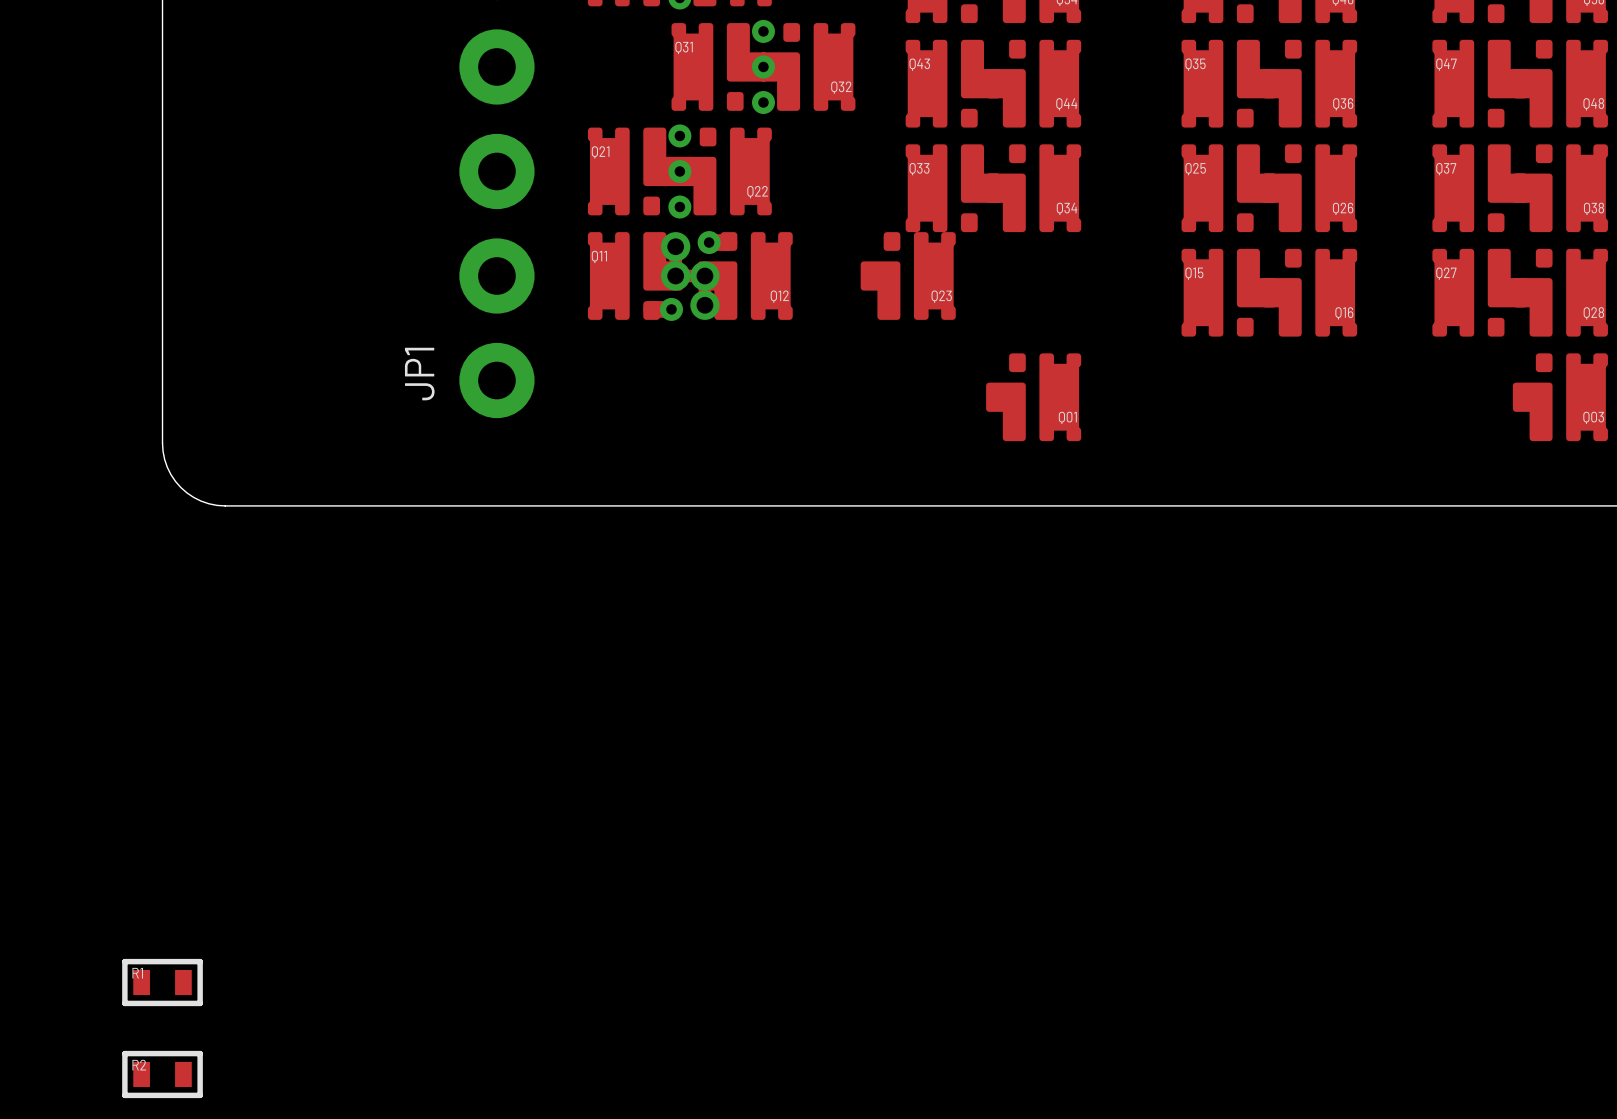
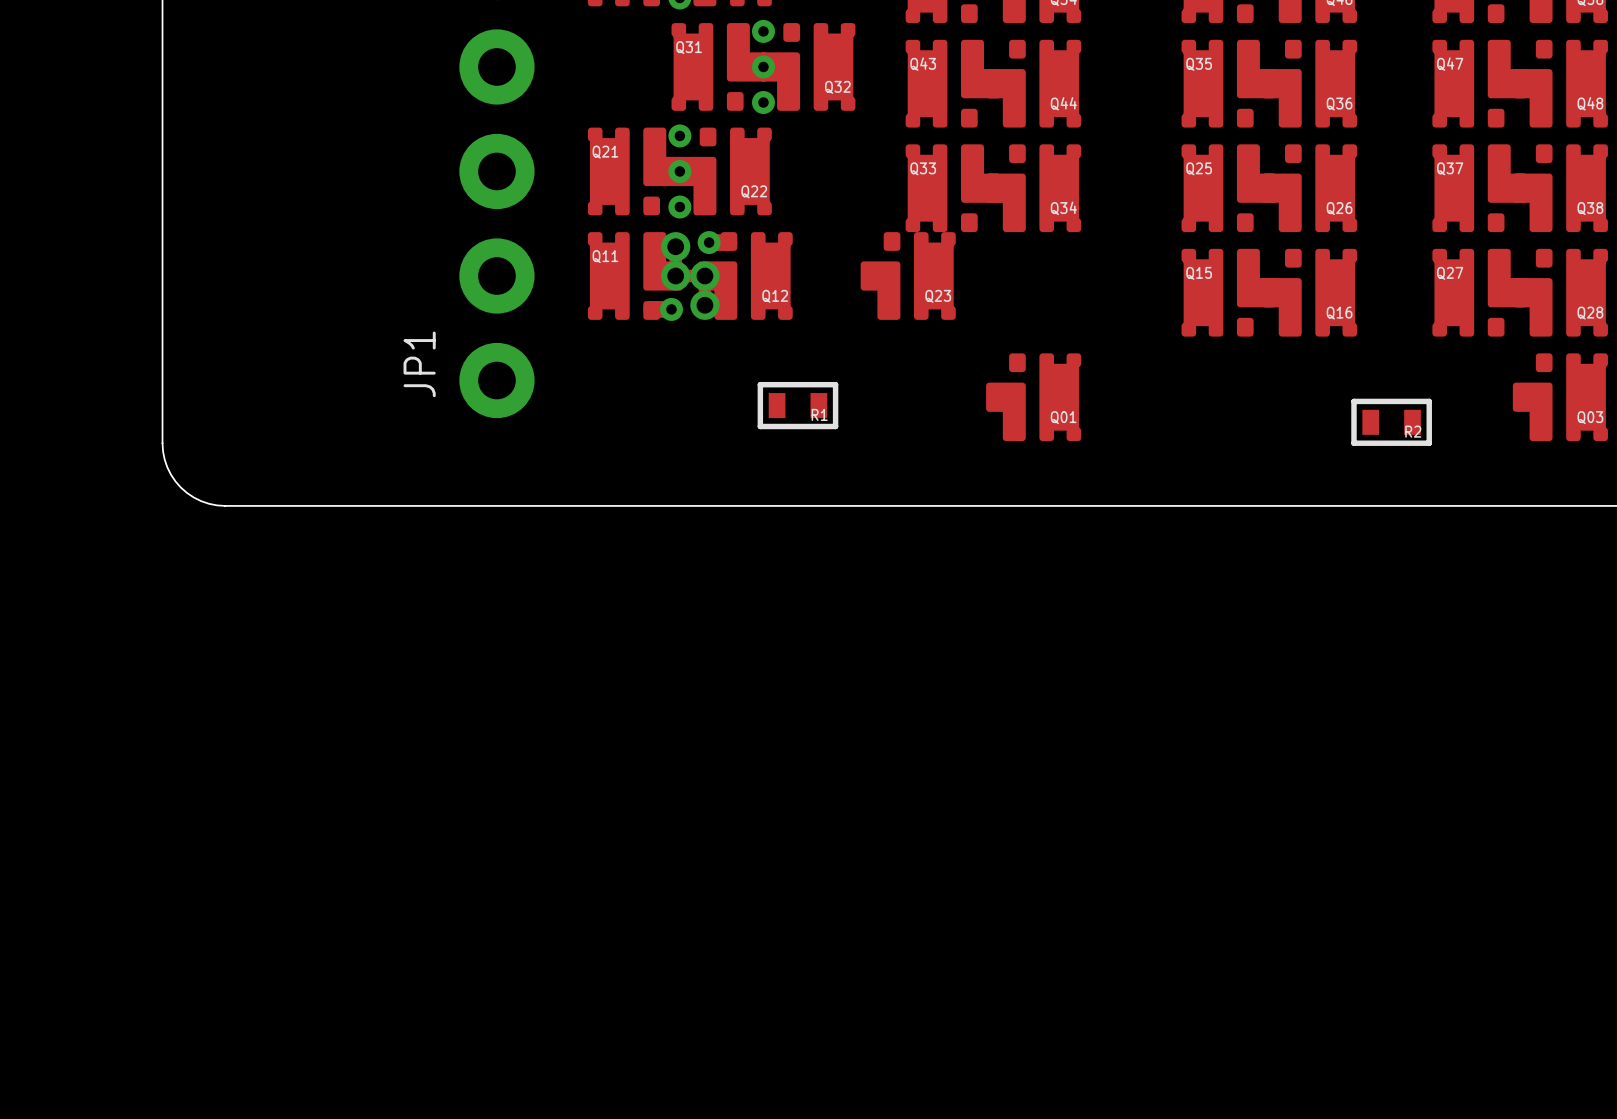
R1 name position: R1 (137, 973) -> R1 (819, 414)
R1 position: (162, 982) -> (797, 405)
R2 name position: R2 (139, 1065) -> R2 (1413, 431)
R2 position: (162, 1074) -> (1391, 422)

